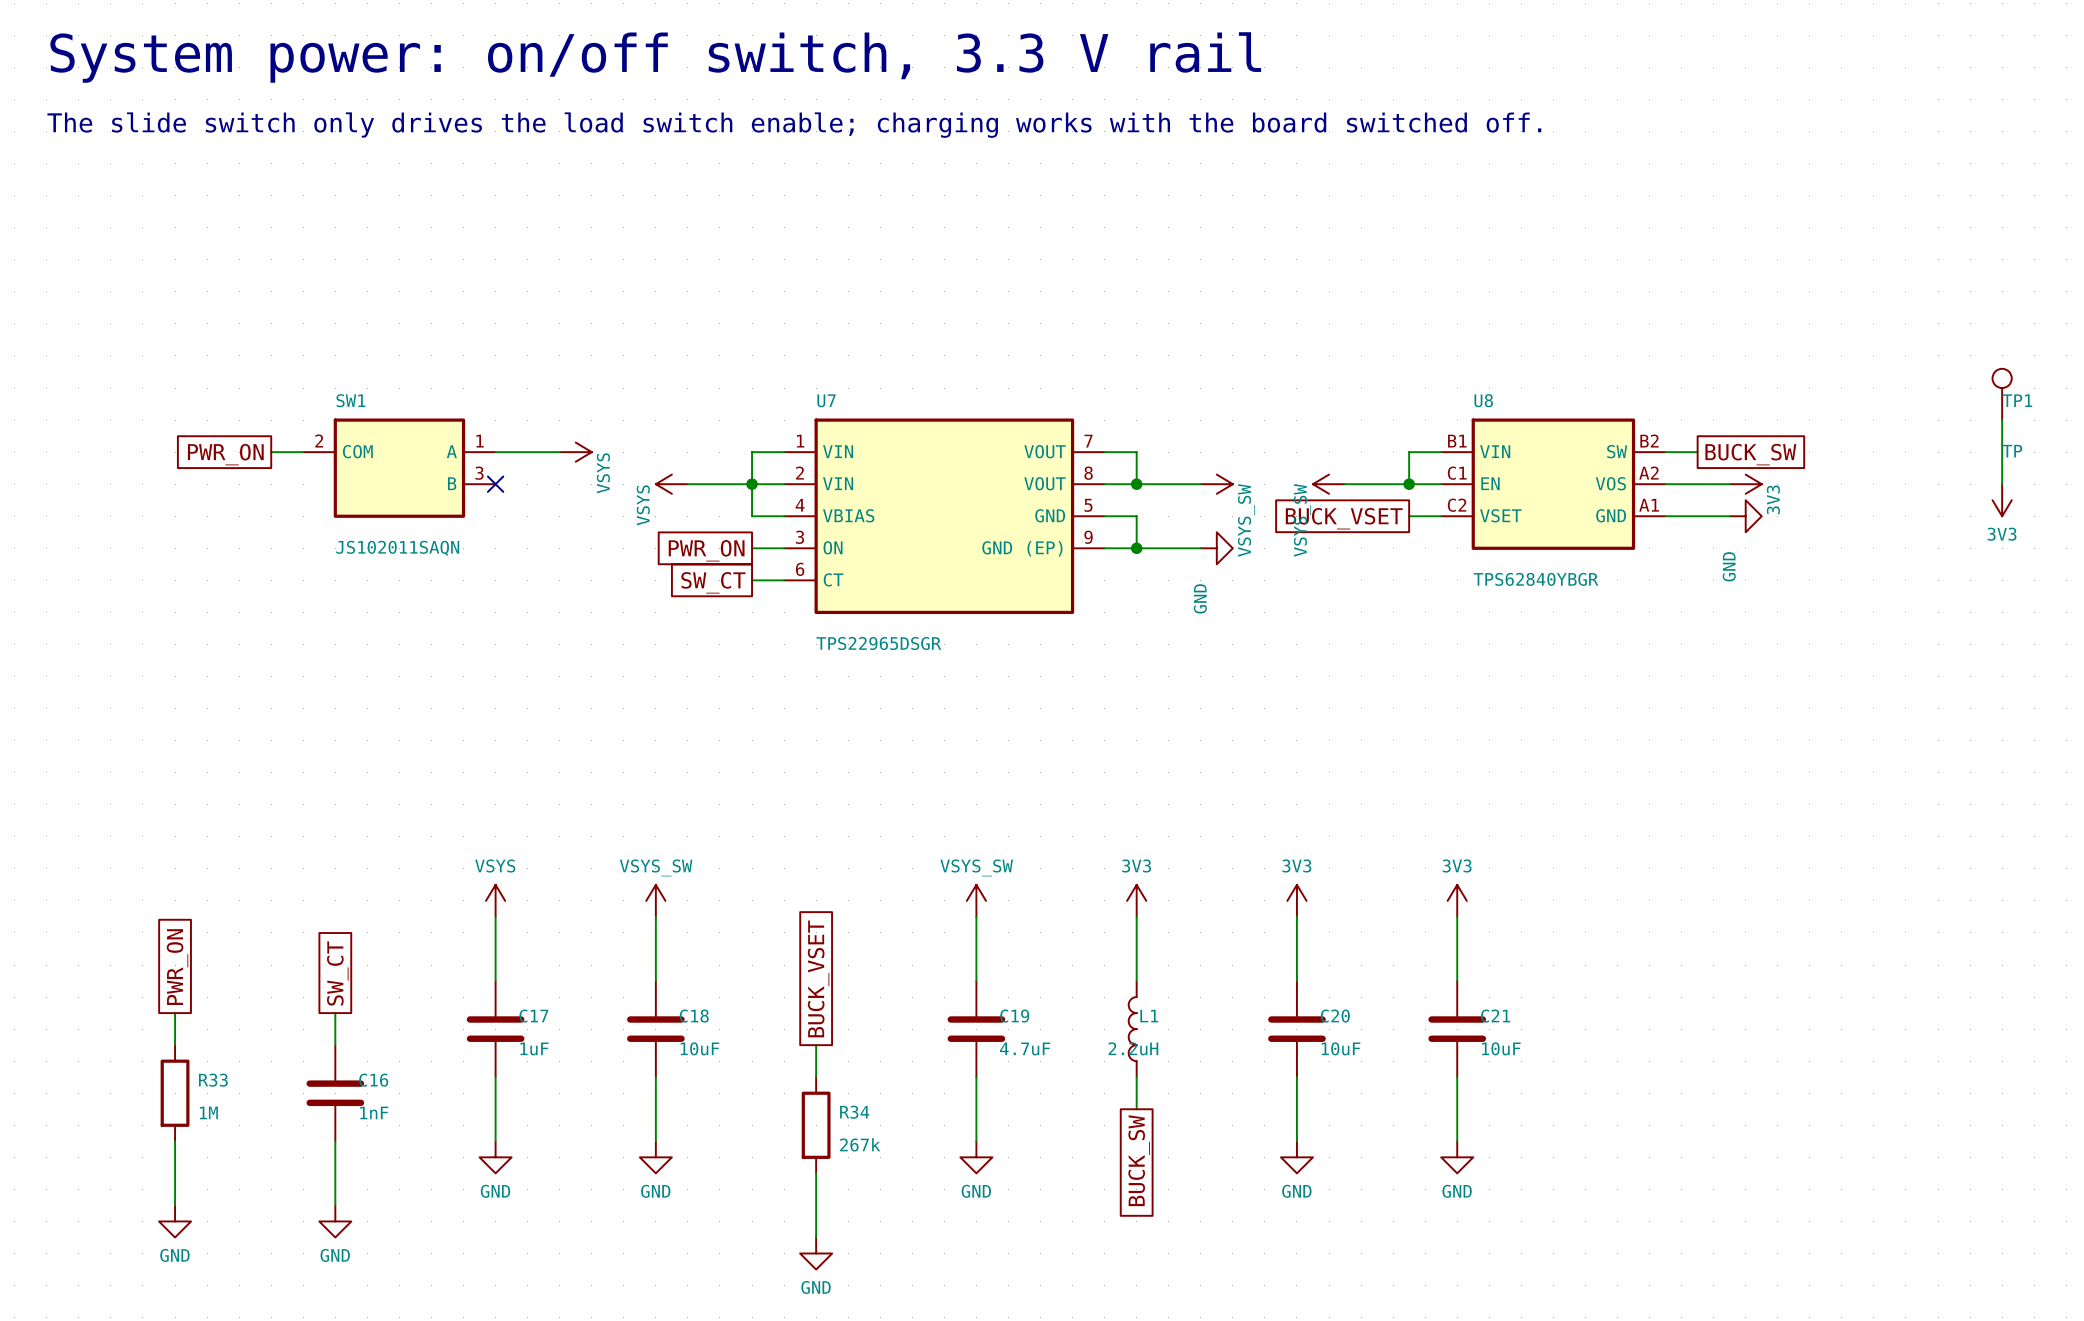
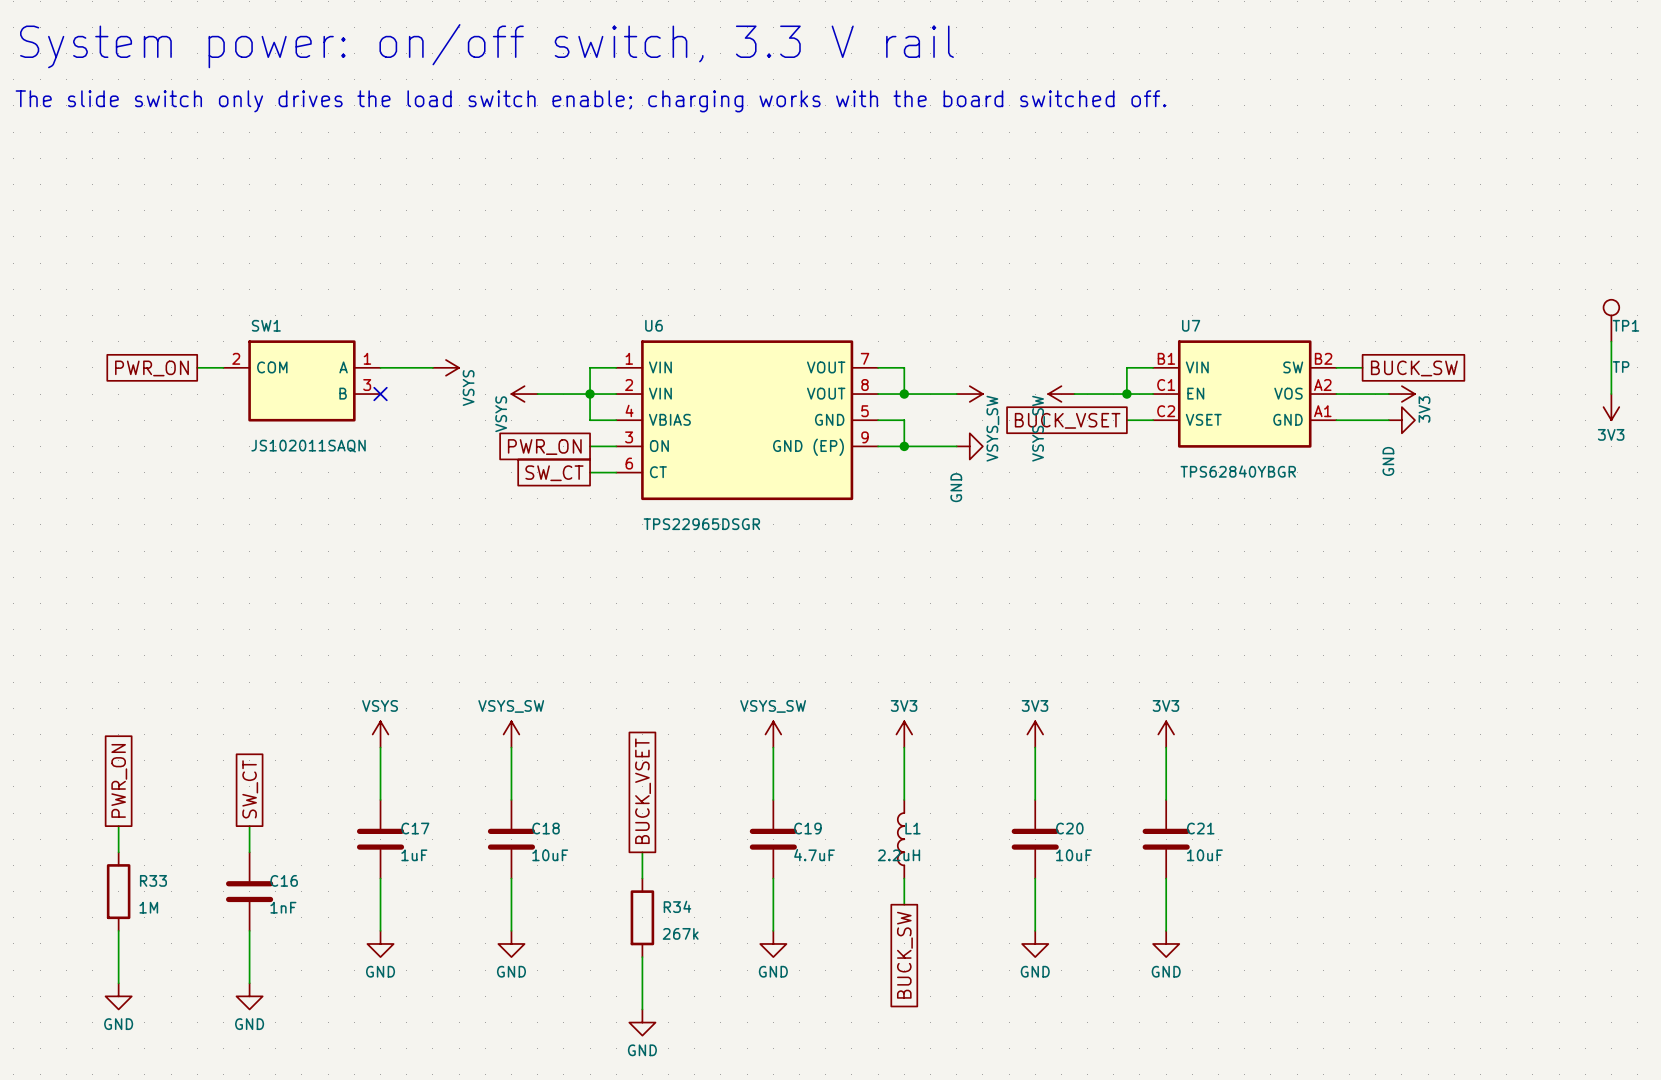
U7 name: U7 (826, 400) -> U6 (654, 325)
U8 name: U8 (1483, 400) -> U7 (1191, 325)

